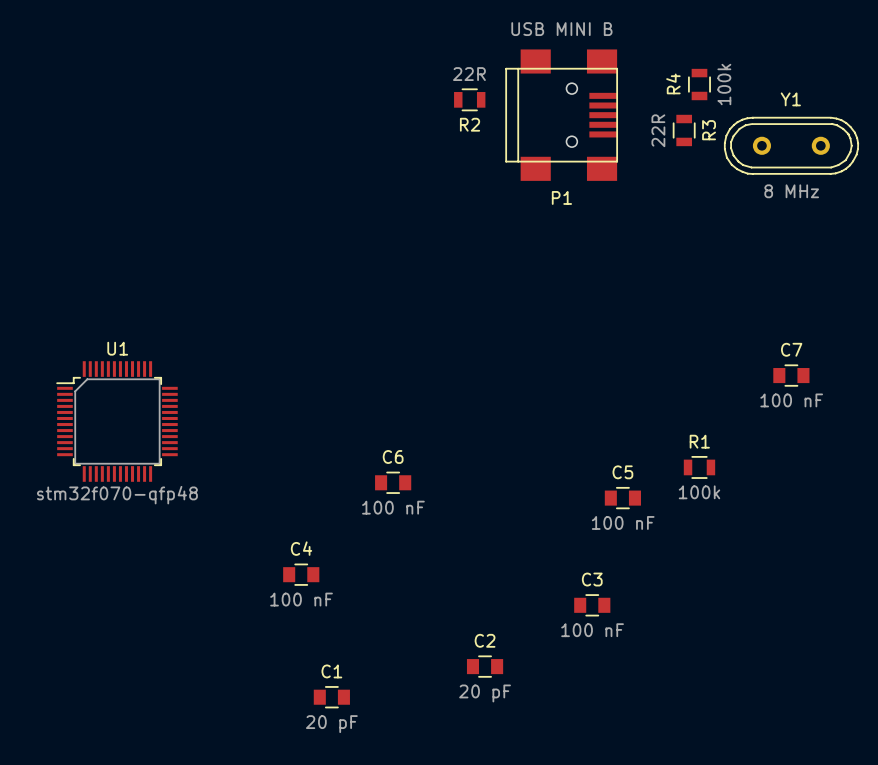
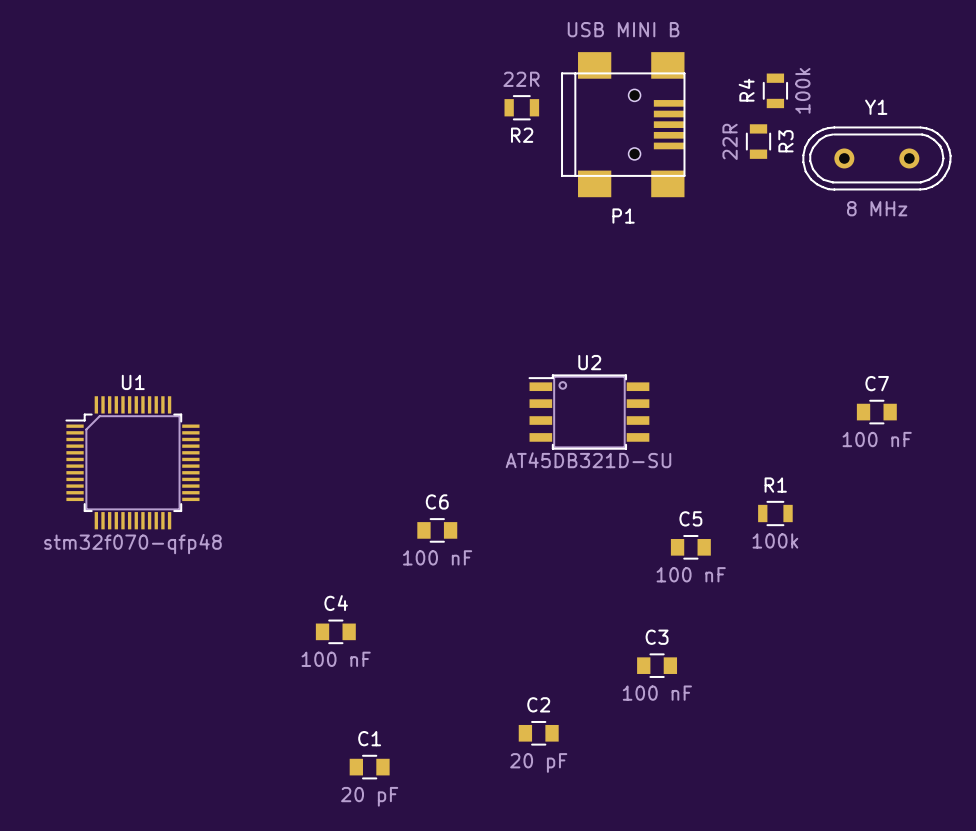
U2: none -> AT45DB321D-SU (588, 412)

